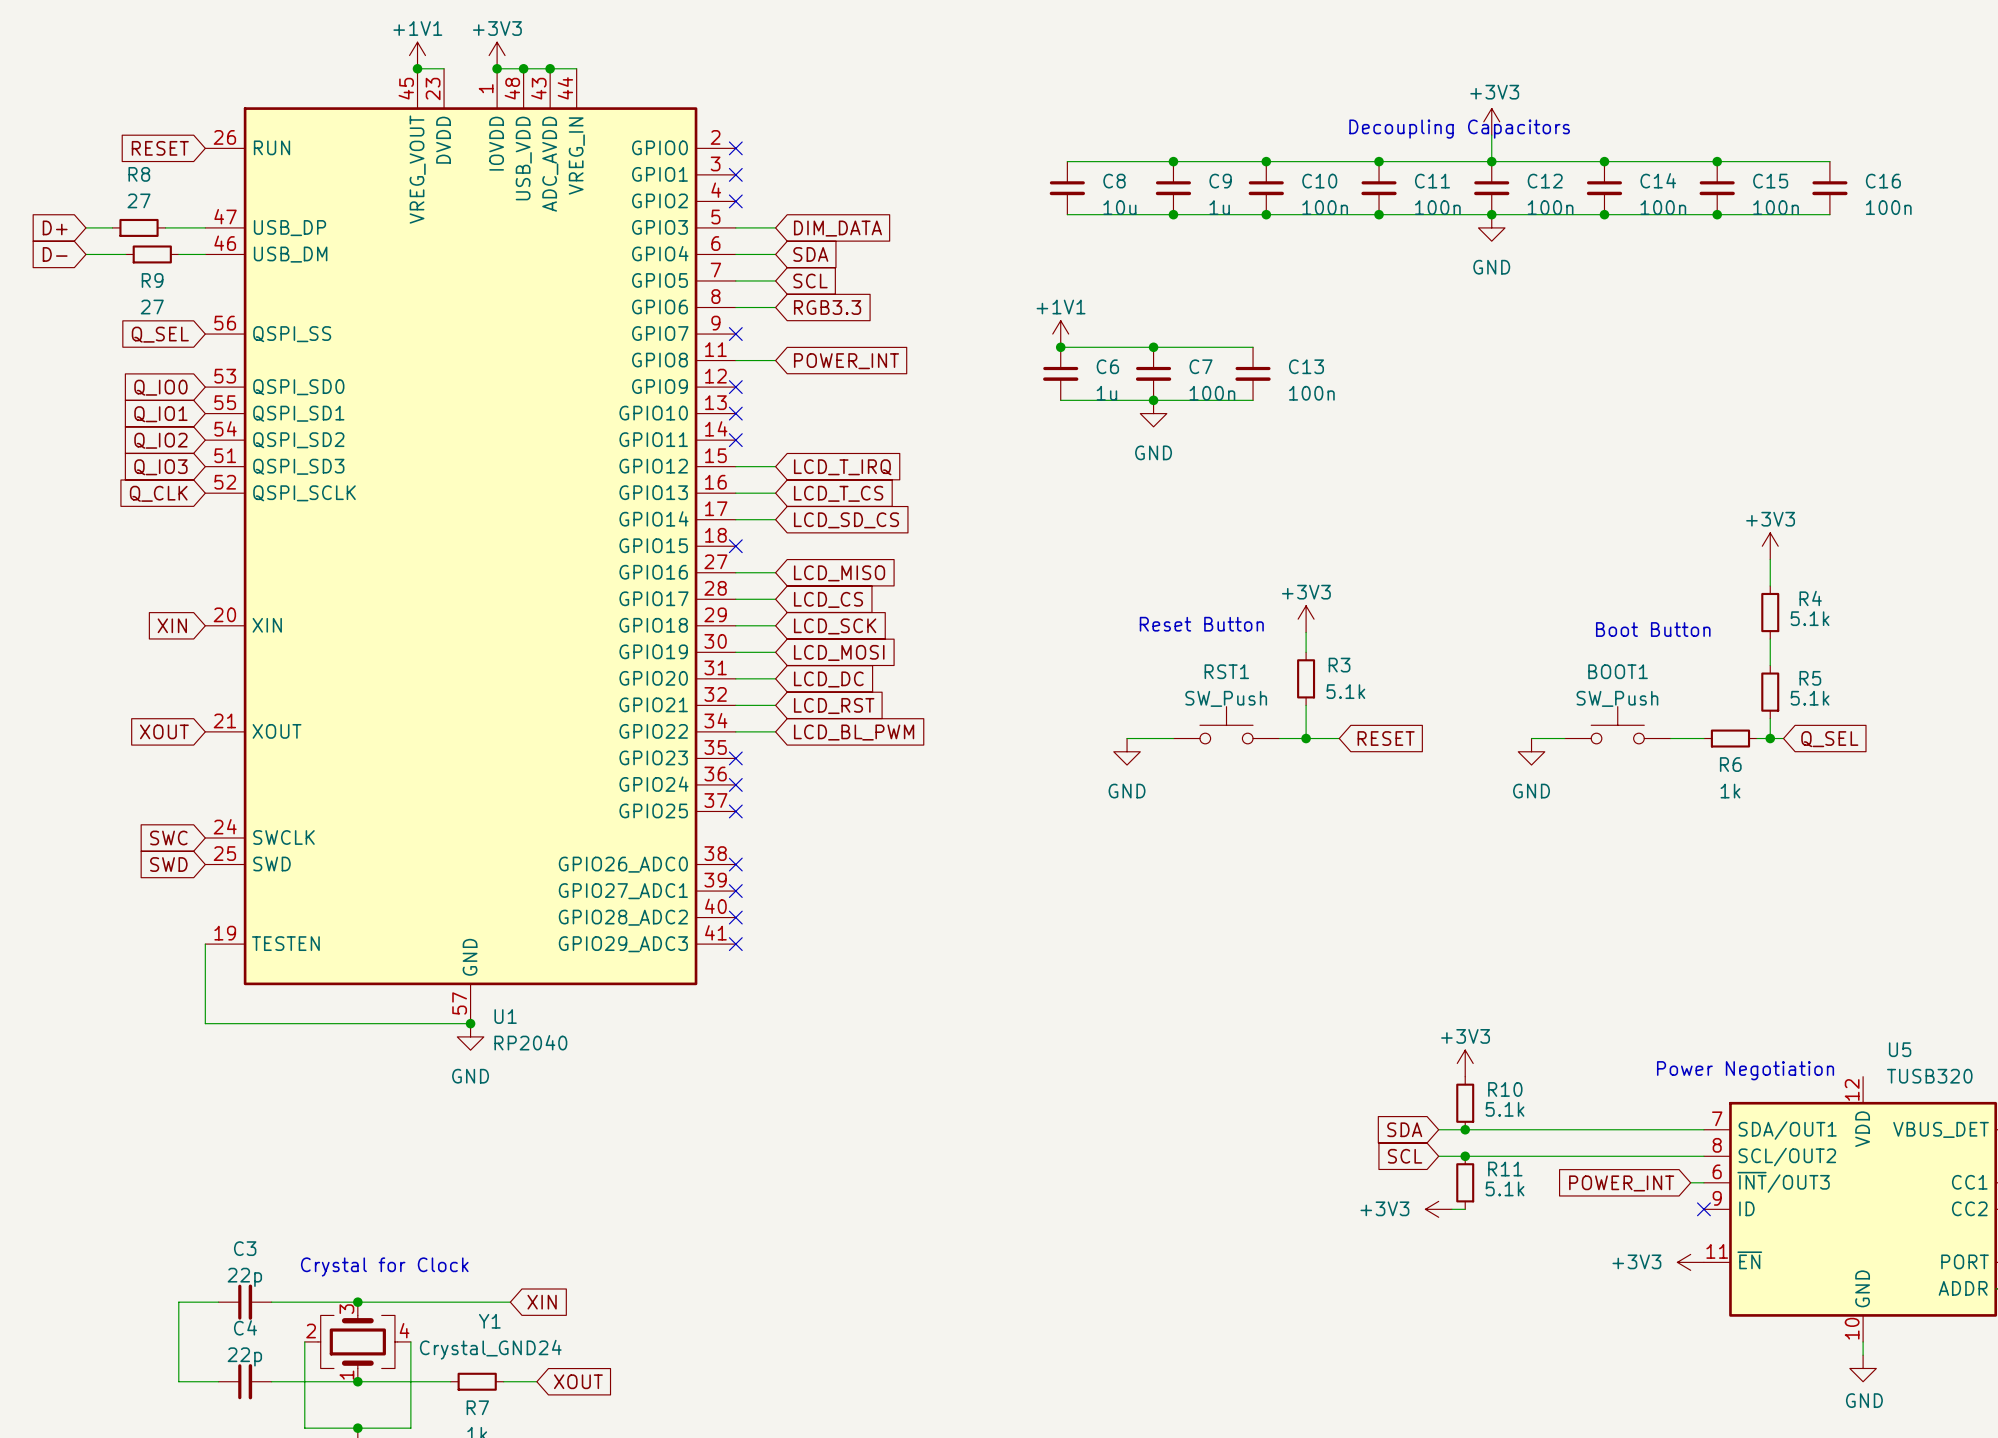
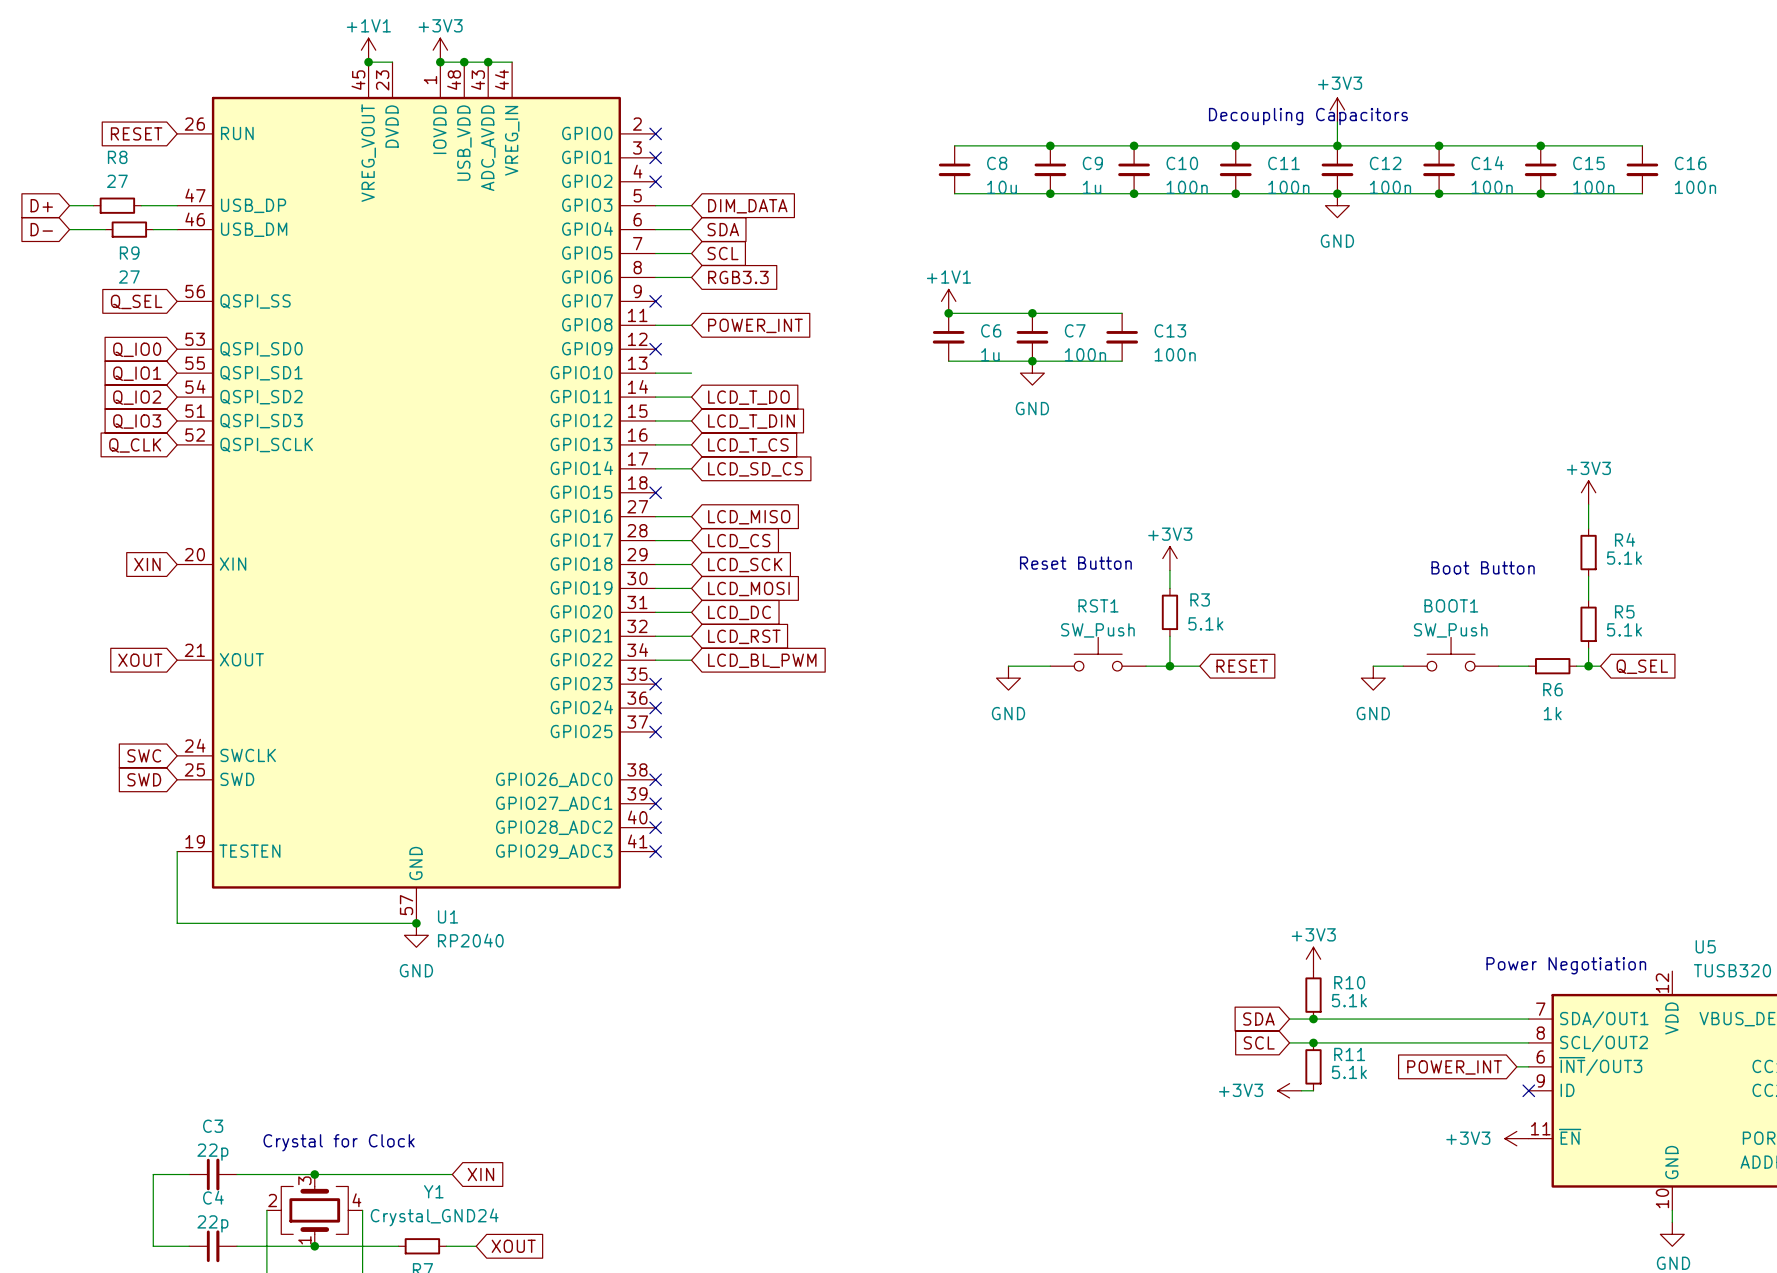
wire: none -> (655, 373) (691, 373)
no-connect mark: (735, 413) -> none
wire: none -> (655, 397) (691, 397)
no-connect mark: (735, 440) -> none
global label: none -> LCD_T_DO (748, 397)
global label: LCD_T_IRQ (842, 467) -> LCD_T_DIN (751, 421)

